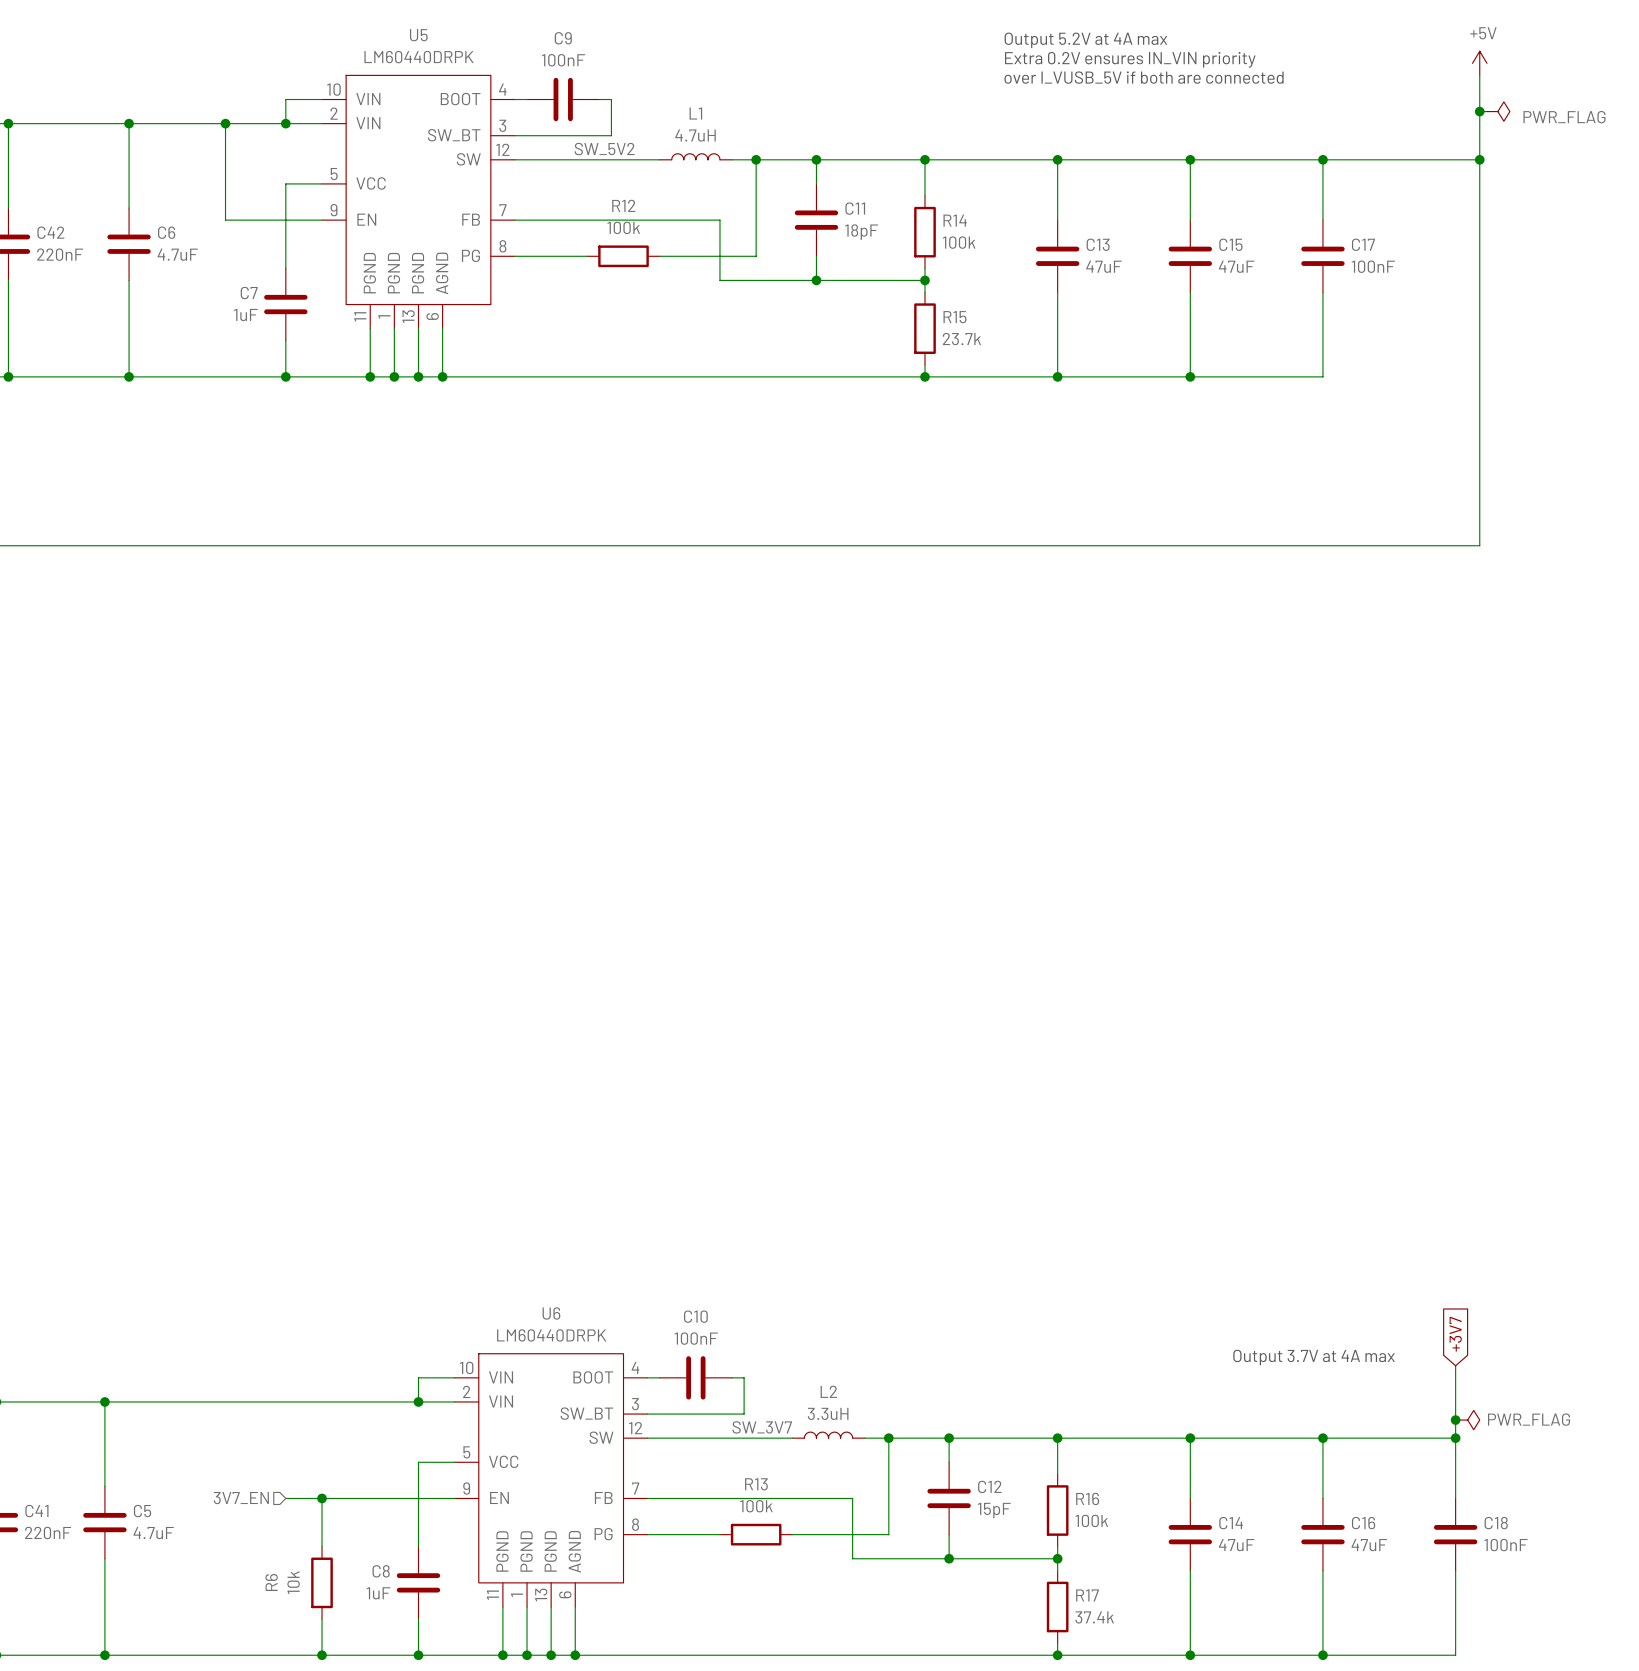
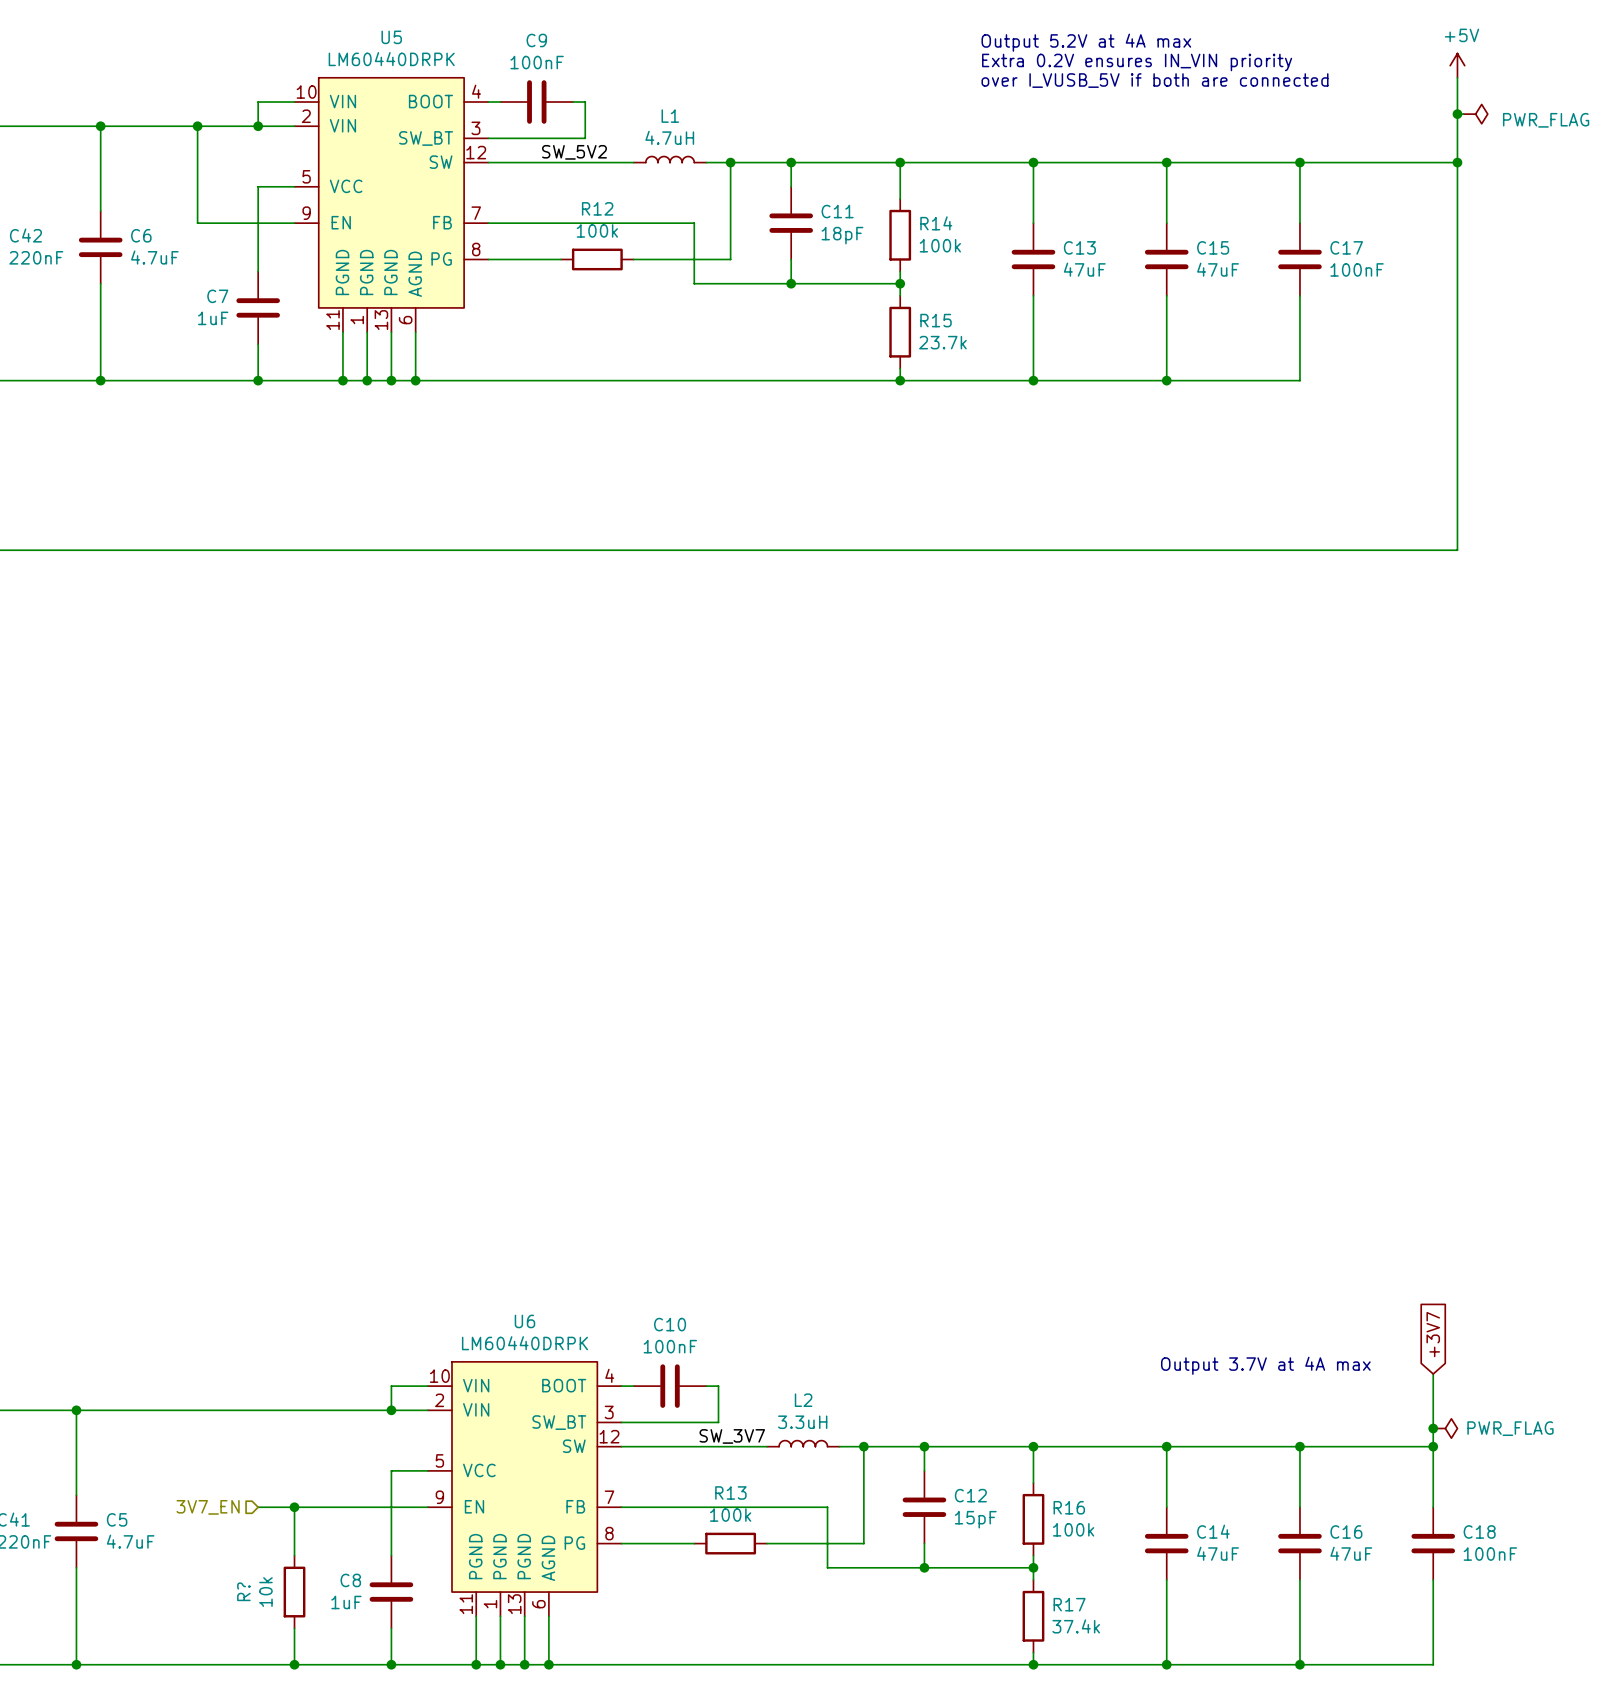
R6 name: R6 (271, 1582) -> R? (243, 1591)

